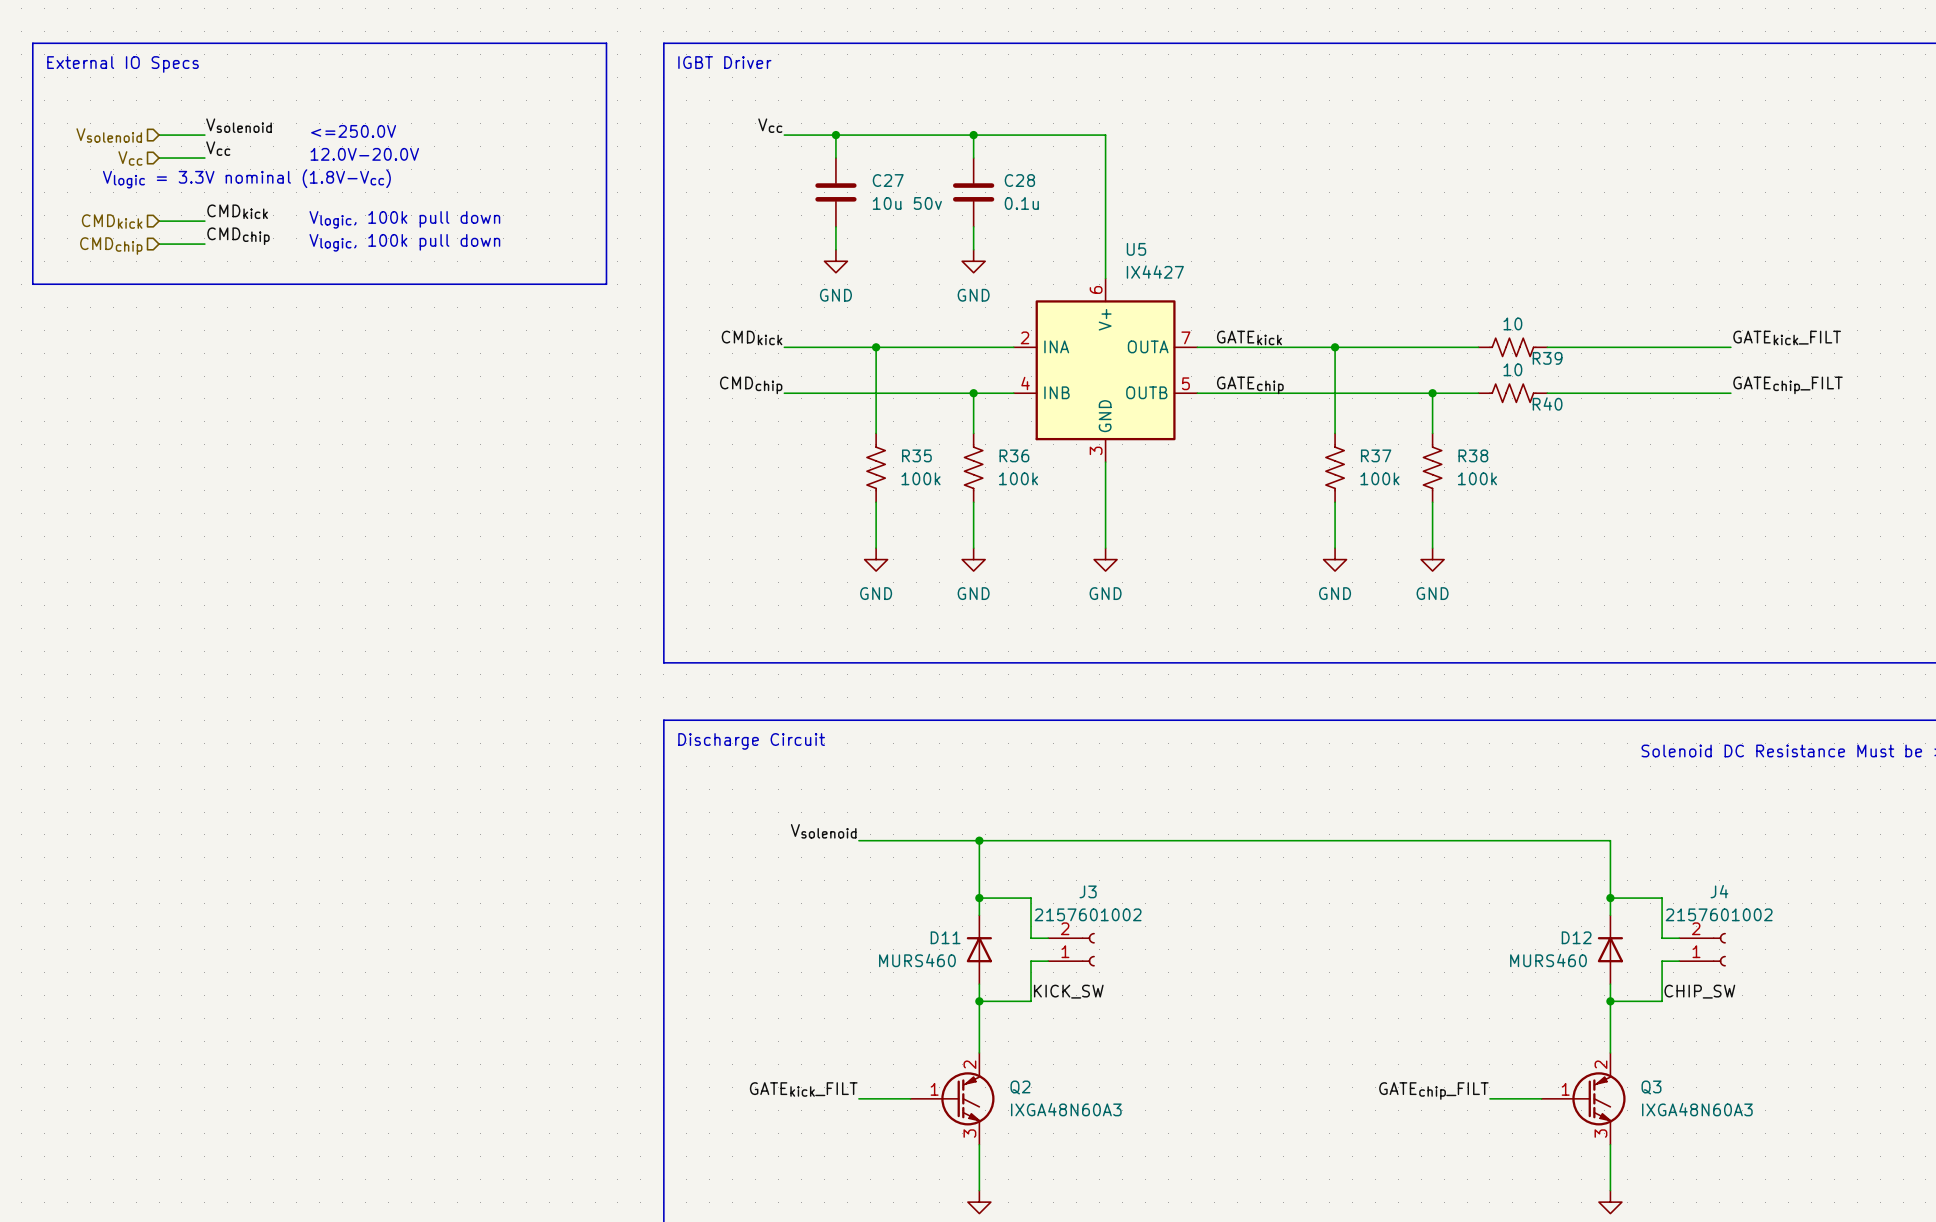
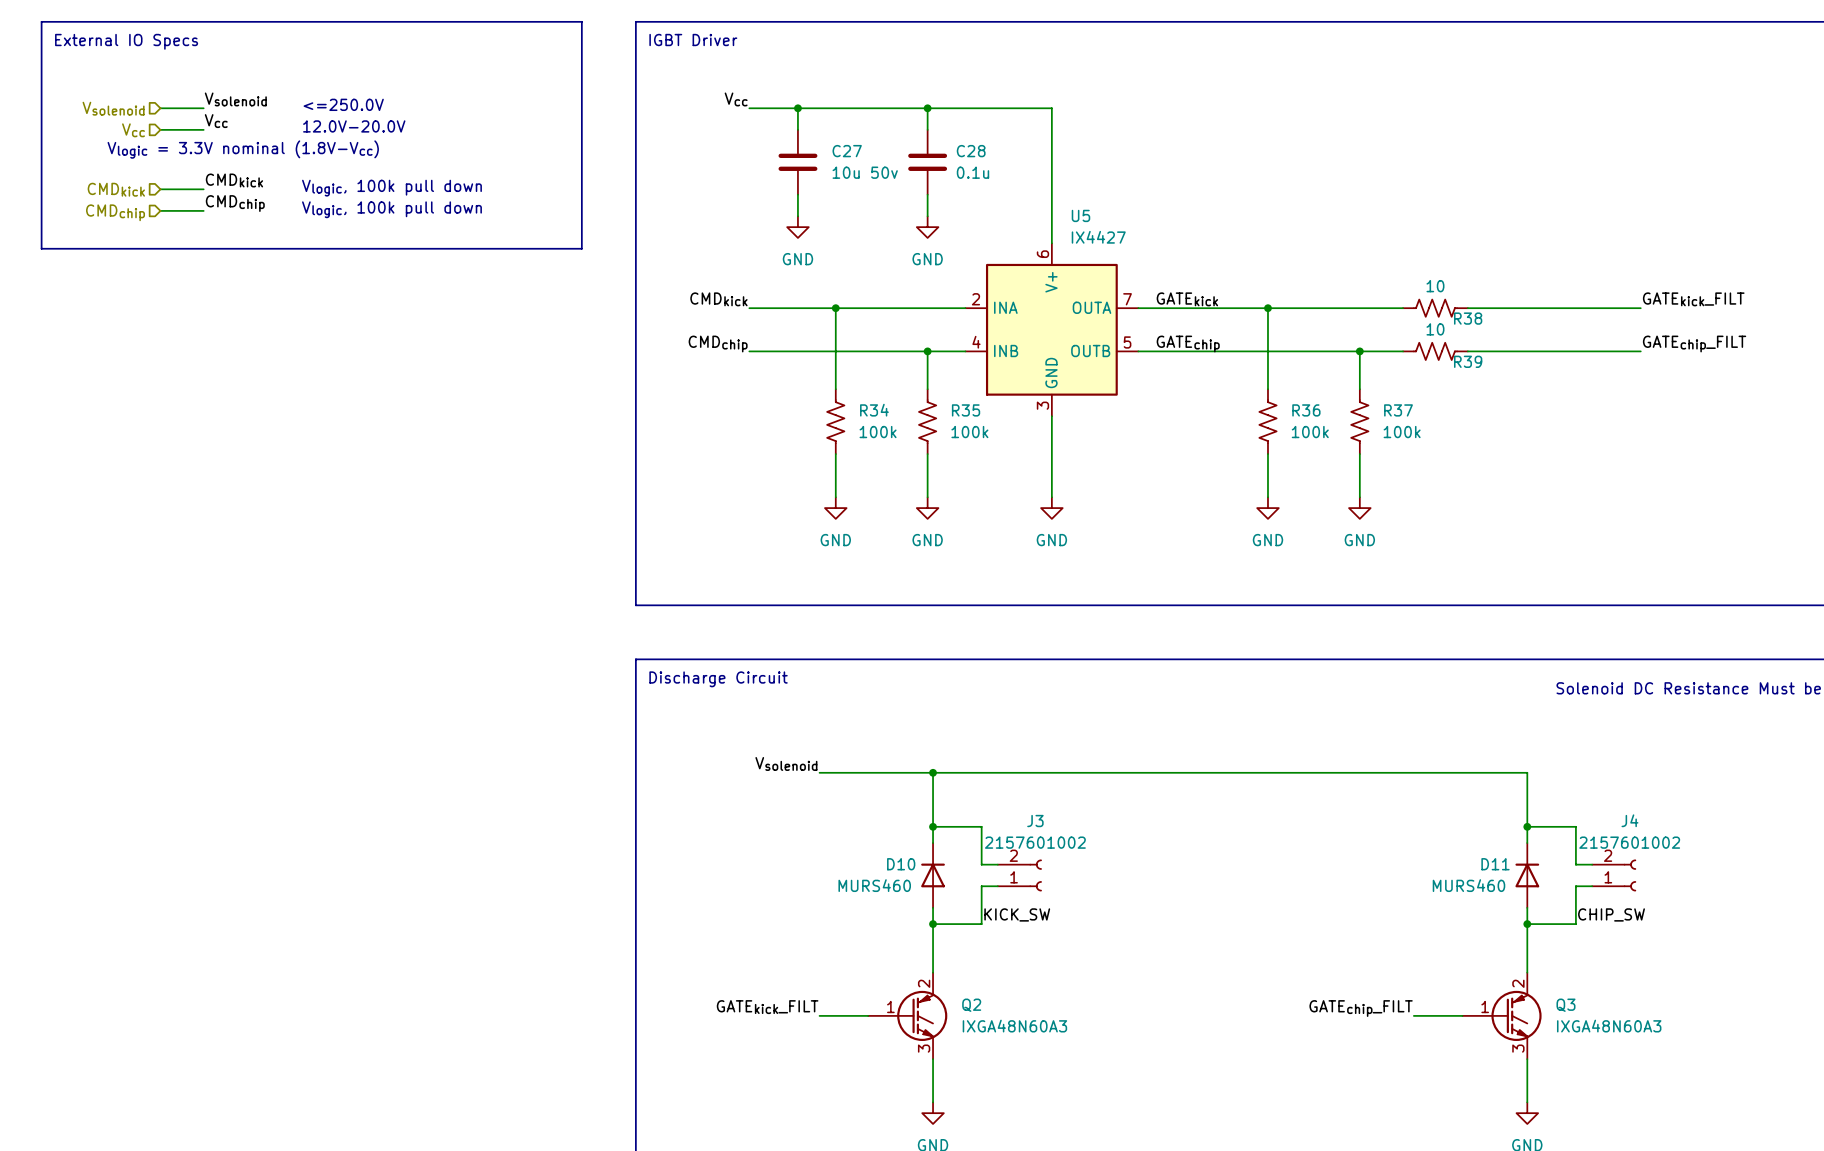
R39 name: R39 (1547, 358) -> R38 (1468, 318)
R40 name: R40 (1547, 403) -> R39 (1468, 361)
R35 name: R35 (916, 455) -> R34 (874, 410)
R36 name: R36 (1014, 455) -> R35 (966, 410)
R37 name: R37 (1376, 455) -> R36 (1306, 410)
R38 name: R38 (1473, 455) -> R37 (1398, 410)
D11 name: D11 (945, 937) -> D10 (901, 864)
D12 name: D12 (1576, 937) -> D11 (1495, 864)

